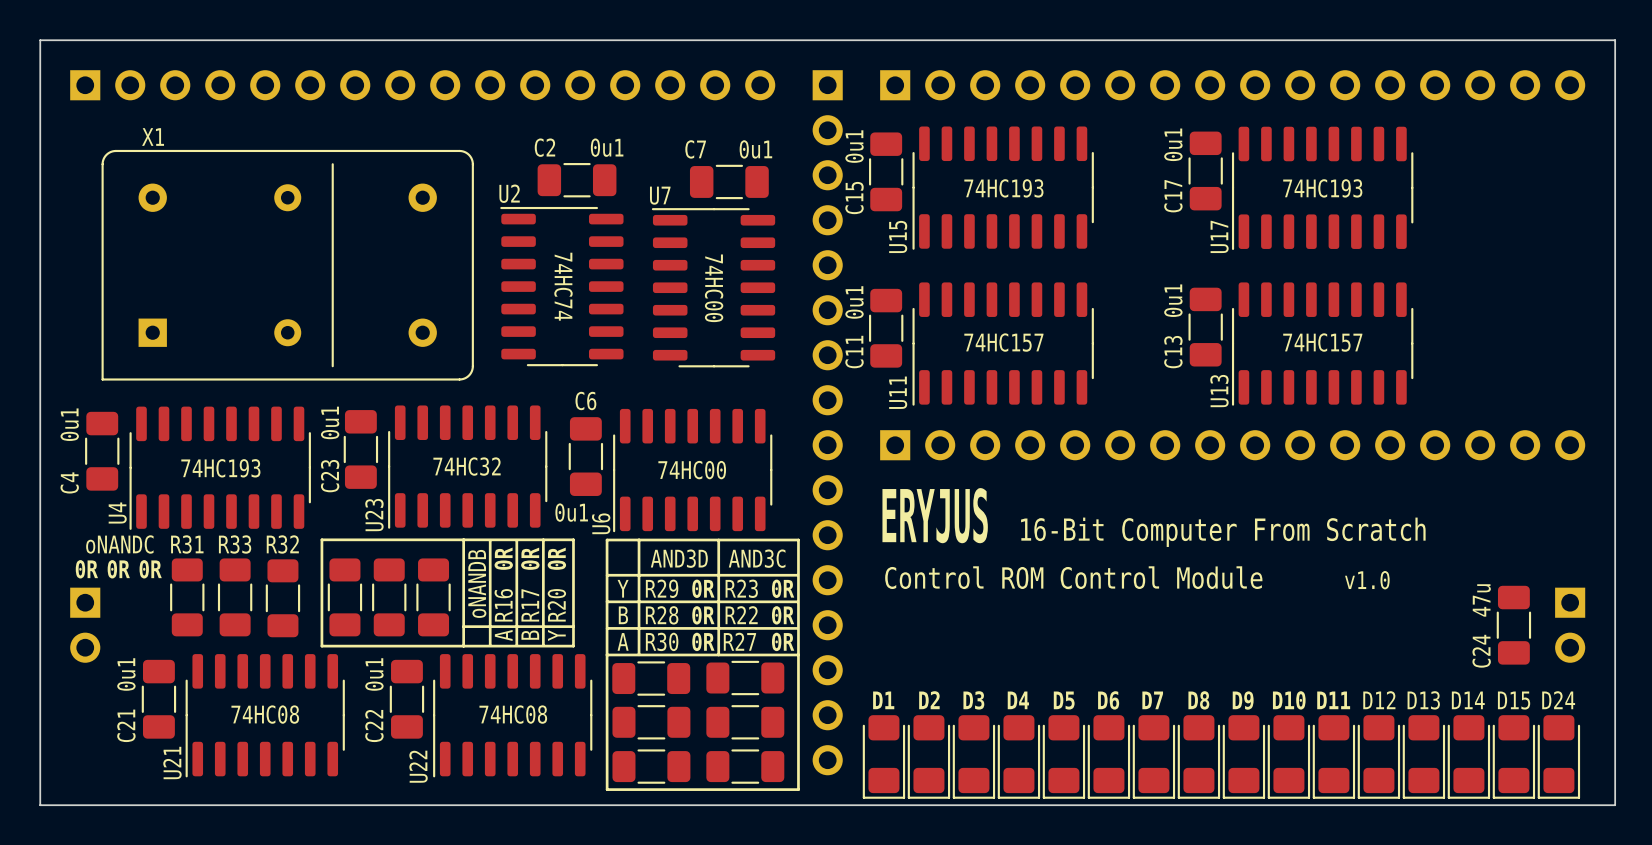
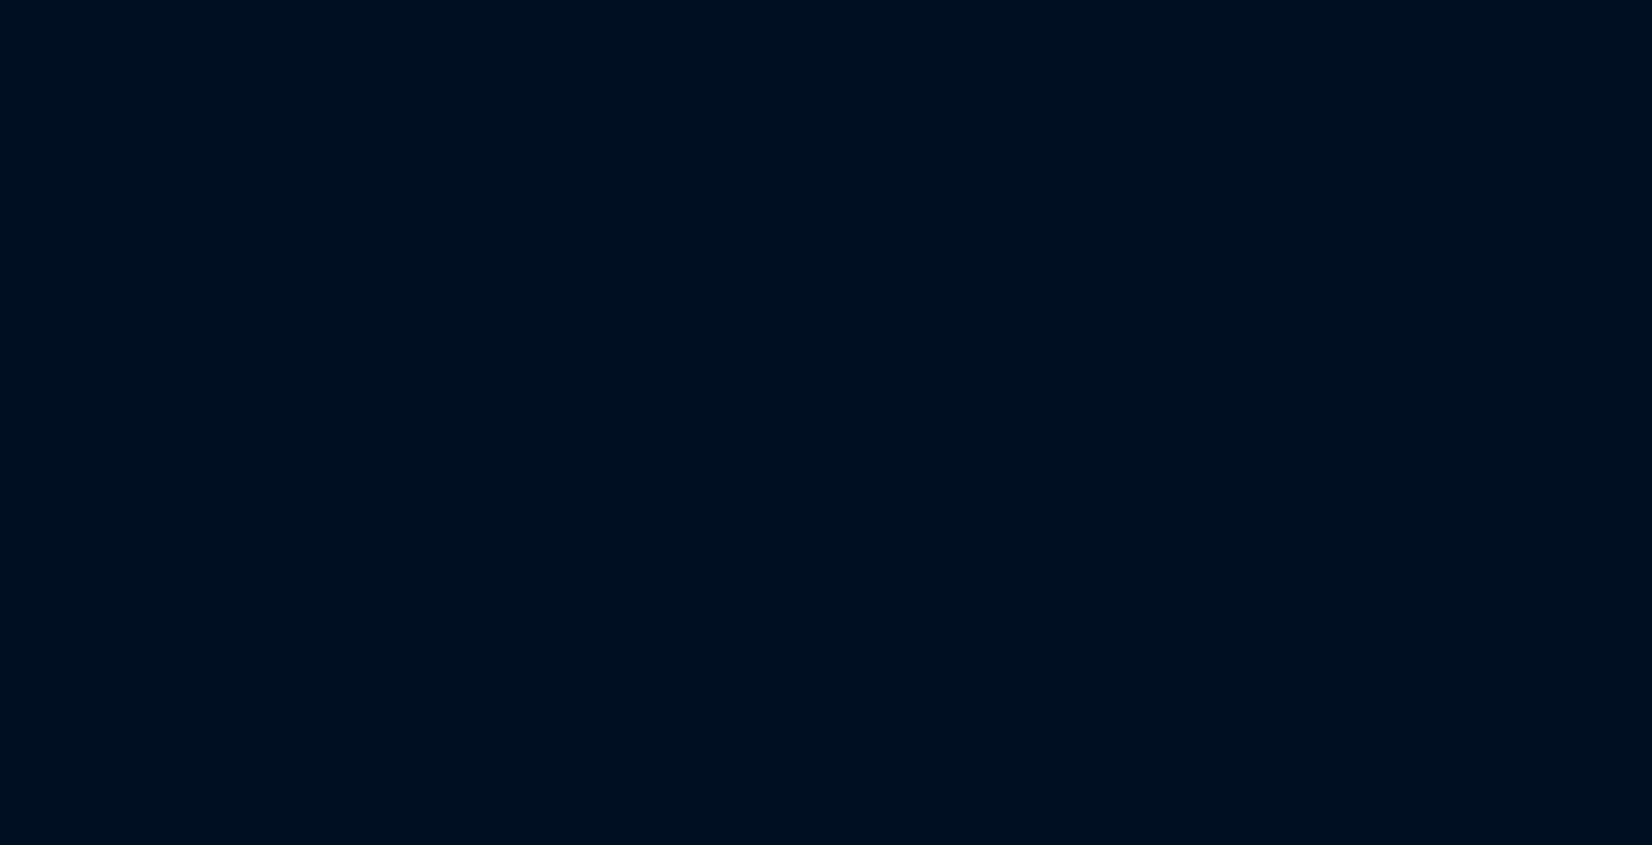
board edge: (40, 40) (1615, 40) (1615, 805) (40, 805) (40, 40) -> none
part: (422, 85) -> none
part: (1232, 85) -> none
text: 0u1 (1173, 144) -> none
text: 0u1 (854, 146) -> none
text: 0u1 (607, 147) -> none
text: 0u1 (755, 149) -> none
C17: (1205, 170) -> none
C15: (886, 171) -> none
C2: (577, 180) -> none
C7: (729, 181) -> none
U15: (1003, 188) -> none
text: 74HC193 (1003, 188) -> none
U17: (1322, 188) -> none
text: 74HC193 (1322, 188) -> none
X1: (287, 265) -> none
U2: (561, 286) -> none
text: 74HC74 (563, 286) -> none
U7: (713, 287) -> none
text: 74HC00 (714, 288) -> none
text: 0u1 (1173, 300) -> none
text: 0u1 (854, 302) -> none
C13: (1205, 327) -> none
C11: (886, 328) -> none
text: 74HC157 (1003, 342) -> none
text: 74HC157 (1322, 342) -> none
U11: (1003, 344) -> none
U13: (1322, 344) -> none
text: 0u1 (330, 422) -> none
part: (827, 422) -> none
text: 0u1 (69, 424) -> none
part: (1232, 445) -> none
C23: (360, 449) -> none
C4: (102, 451) -> none
C6: (585, 456) -> none
text: 74HC32 (467, 466) -> none
U23: (467, 467) -> none
U4: (220, 468) -> none
text: 74HC193 (220, 468) -> none
U6: (692, 470) -> none
text: 74HC00 (692, 470) -> none
text: 0u1 (571, 512) -> none
text: ERYJUS (935, 515) -> none
text: 16-Bit Computer From Scratch (1223, 532) -> none
line: (321, 539) (321, 646) (573, 646) (573, 539) (321, 539) -> none
line: (463, 539) (463, 646) -> none
line: (543, 539) (543, 645) -> none
line: (639, 539) (639, 654) -> none
line: (490, 540) (490, 645) -> none
line: (516, 540) (516, 645) -> none
line: (718, 540) (718, 654) -> none
text: oNANDC (119, 544) -> none
text: 0R (503, 558) -> none
text: 0R (530, 558) -> none
text: 0R (556, 558) -> none
text: AND3D (679, 558) -> none
text: AND3C (757, 558) -> none
text: 0R (86, 569) -> none
text: 0R (118, 569) -> none
text: 0R (150, 569) -> none
line: (607, 575) (797, 575) -> none
text: Control ROM Control Module (1073, 577) -> none
text: v1.0 (1367, 580) -> none
text: oNANDB (477, 583) -> none
text: Y (623, 588) -> none
text: 0R (703, 588) -> none
text: 0R (783, 588) -> none
R31: (187, 597) -> none
R33: (235, 597) -> none
R16: (344, 597) -> none
R17: (389, 597) -> none
R20: (433, 597) -> none
R32: (282, 598) -> none
text: 47u (1481, 600) -> none
line: (607, 601) (797, 601) -> none
text: B (623, 615) -> none
text: 0R (703, 615) -> none
text: 0R (783, 615) -> none
part: (85, 625) -> none
C24: (1513, 625) -> none
part: (1570, 625) -> none
line: (463, 626) (573, 626) -> none
line: (607, 628) (796, 628) -> none
text: A (503, 635) -> none
text: B (530, 635) -> none
text: Y (556, 635) -> none
text: A (623, 641) -> none
text: 0R (703, 641) -> none
text: 0R (783, 641) -> none
line: (607, 654) (607, 789) (798, 789) (798, 540) (607, 540) (607, 654) -> none
line: (607, 654) (798, 654) -> none
text: 0u1 (126, 674) -> none
text: 0u1 (374, 674) -> none
R29: (651, 678) -> none
R23: (745, 678) -> none
C21: (158, 699) -> none
C22: (406, 699) -> none
text: 74HC08 (265, 714) -> none
text: 74HC08 (513, 714) -> none
U21: (265, 715) -> none
U22: (512, 715) -> none
R28: (651, 722) -> none
R22: (745, 722) -> none
D1: (883, 756) -> none
D2: (928, 756) -> none
D3: (973, 756) -> none
D4: (1018, 756) -> none
D5: (1063, 756) -> none
D6: (1108, 756) -> none
D7: (1153, 756) -> none
D8: (1198, 756) -> none
D9: (1243, 756) -> none
D10: (1288, 756) -> none
D11: (1333, 756) -> none
D12: (1378, 756) -> none
D13: (1423, 756) -> none
D14: (1468, 756) -> none
D15: (1513, 756) -> none
D24: (1558, 756) -> none
R30: (651, 766) -> none
R27: (745, 766) -> none

